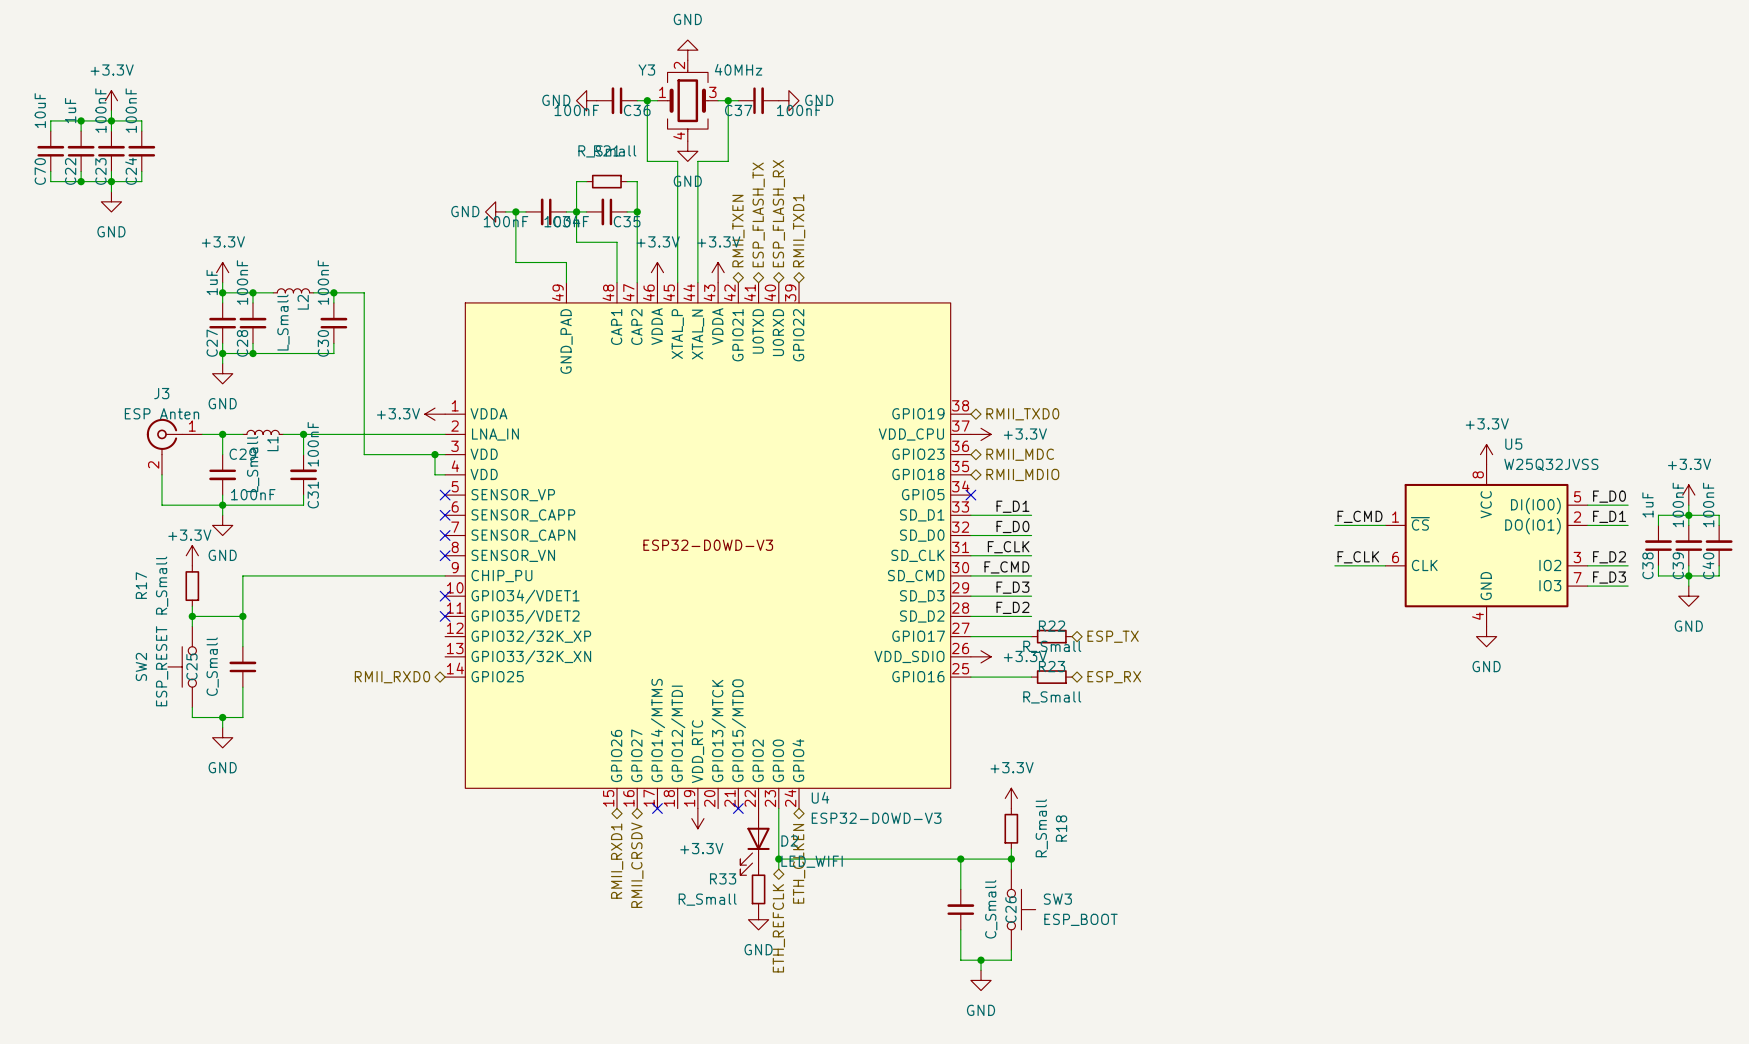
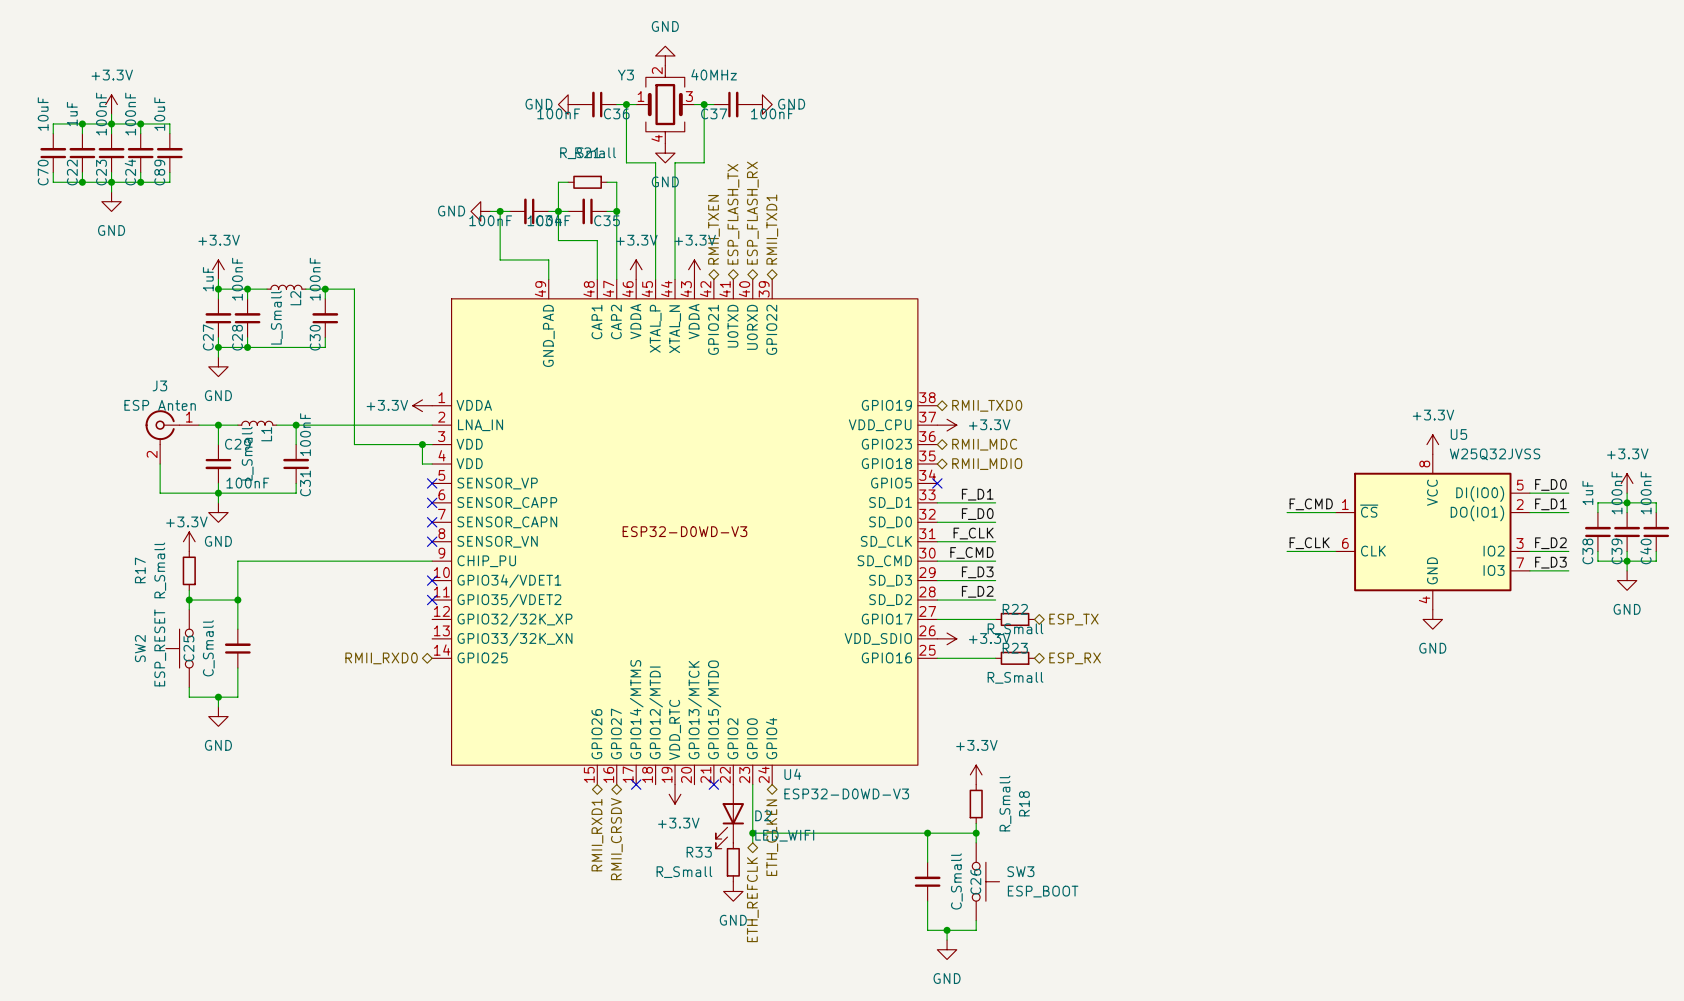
wire: none -> (140, 123) (169, 123) (169, 133)
junction: none -> (140, 123)
C89: none -> 10uF (169, 153)
wire: none -> (169, 172) (169, 182) (140, 182)
junction: none -> (140, 182)

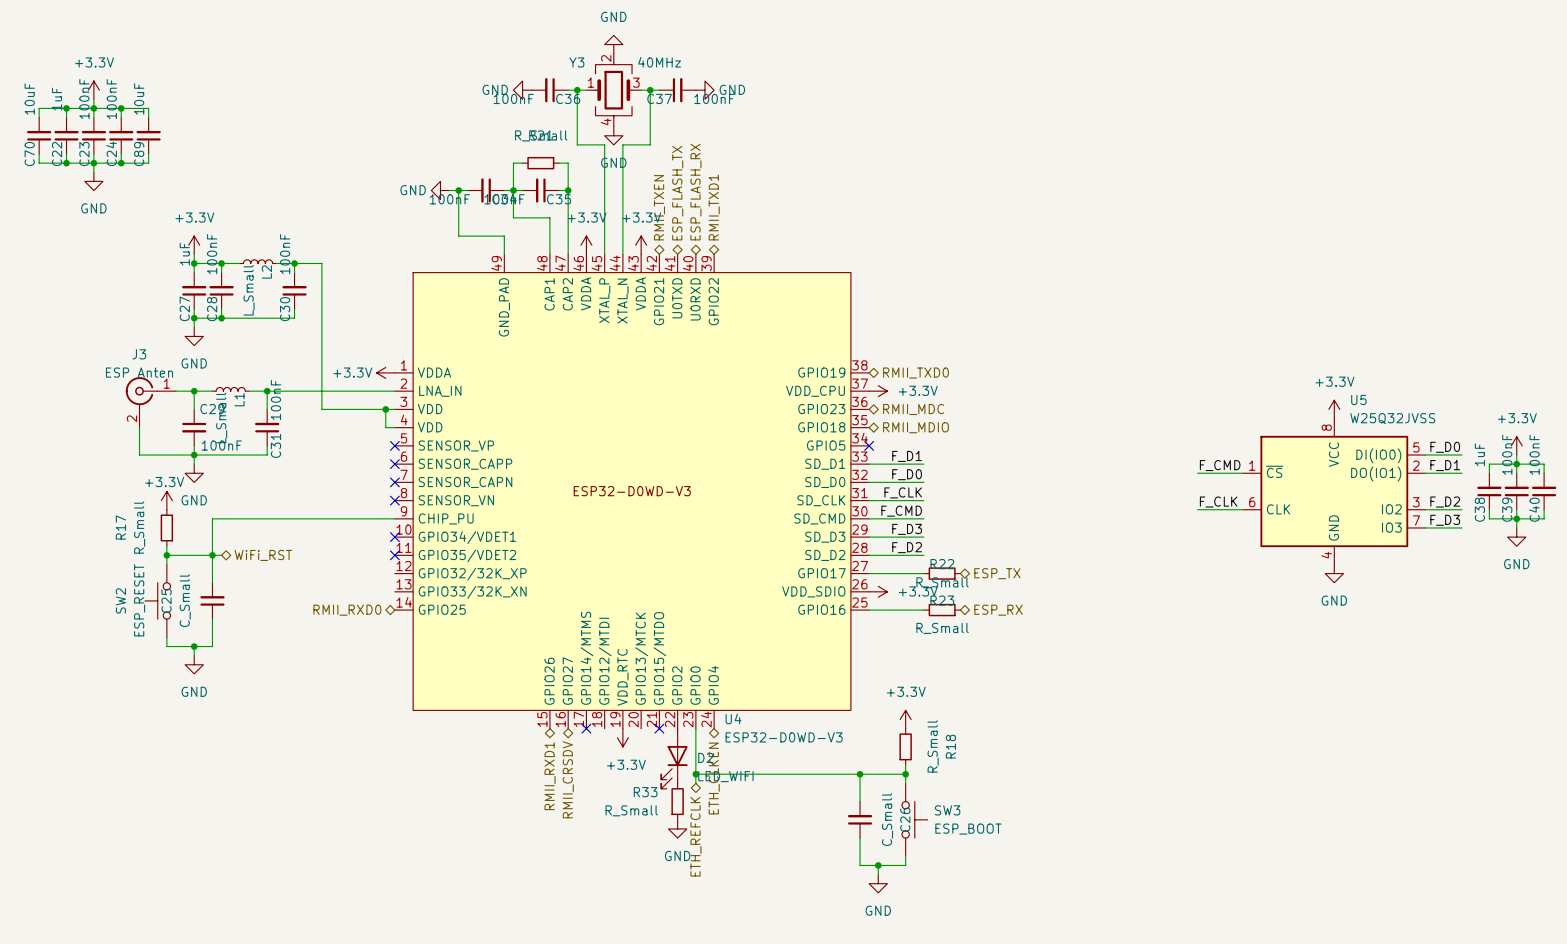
wire: none -> (212, 555) (221, 555)
hierarchical label: none -> WiFi_RST (263, 555)

